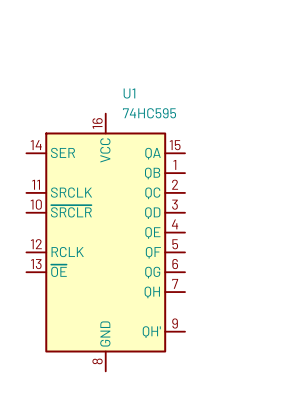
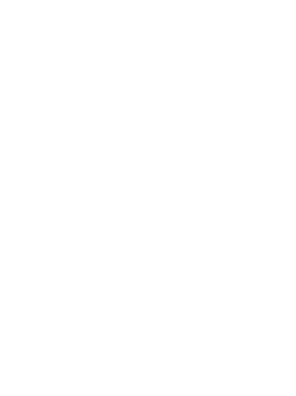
U1: 74HC595 (105, 242) -> none

